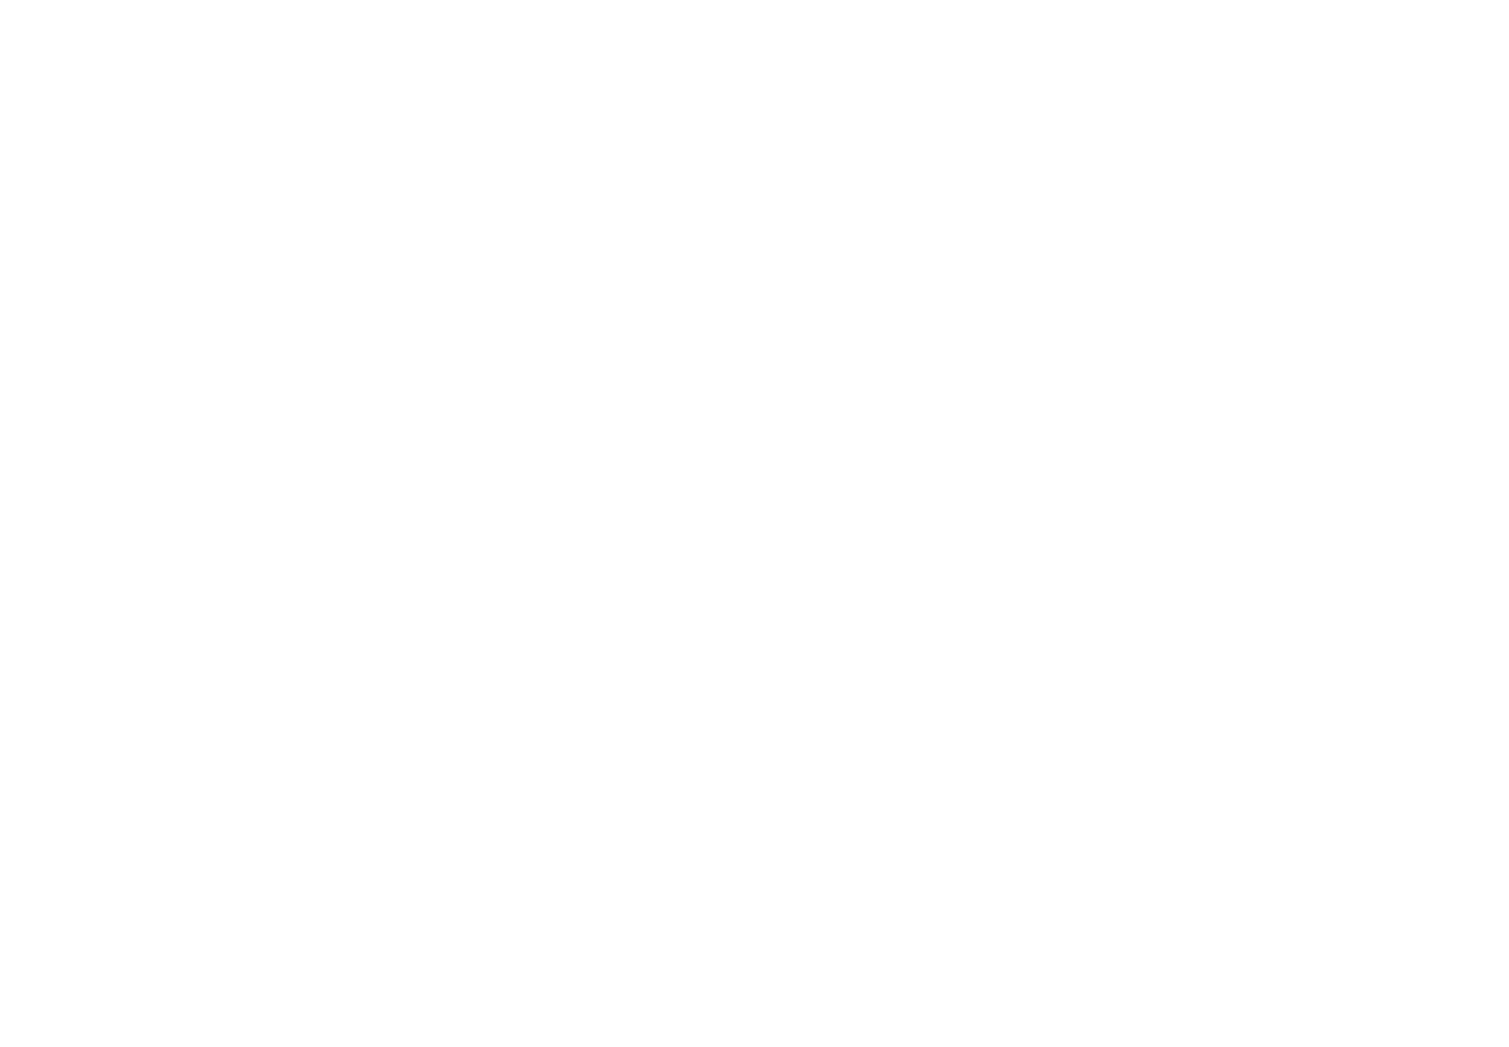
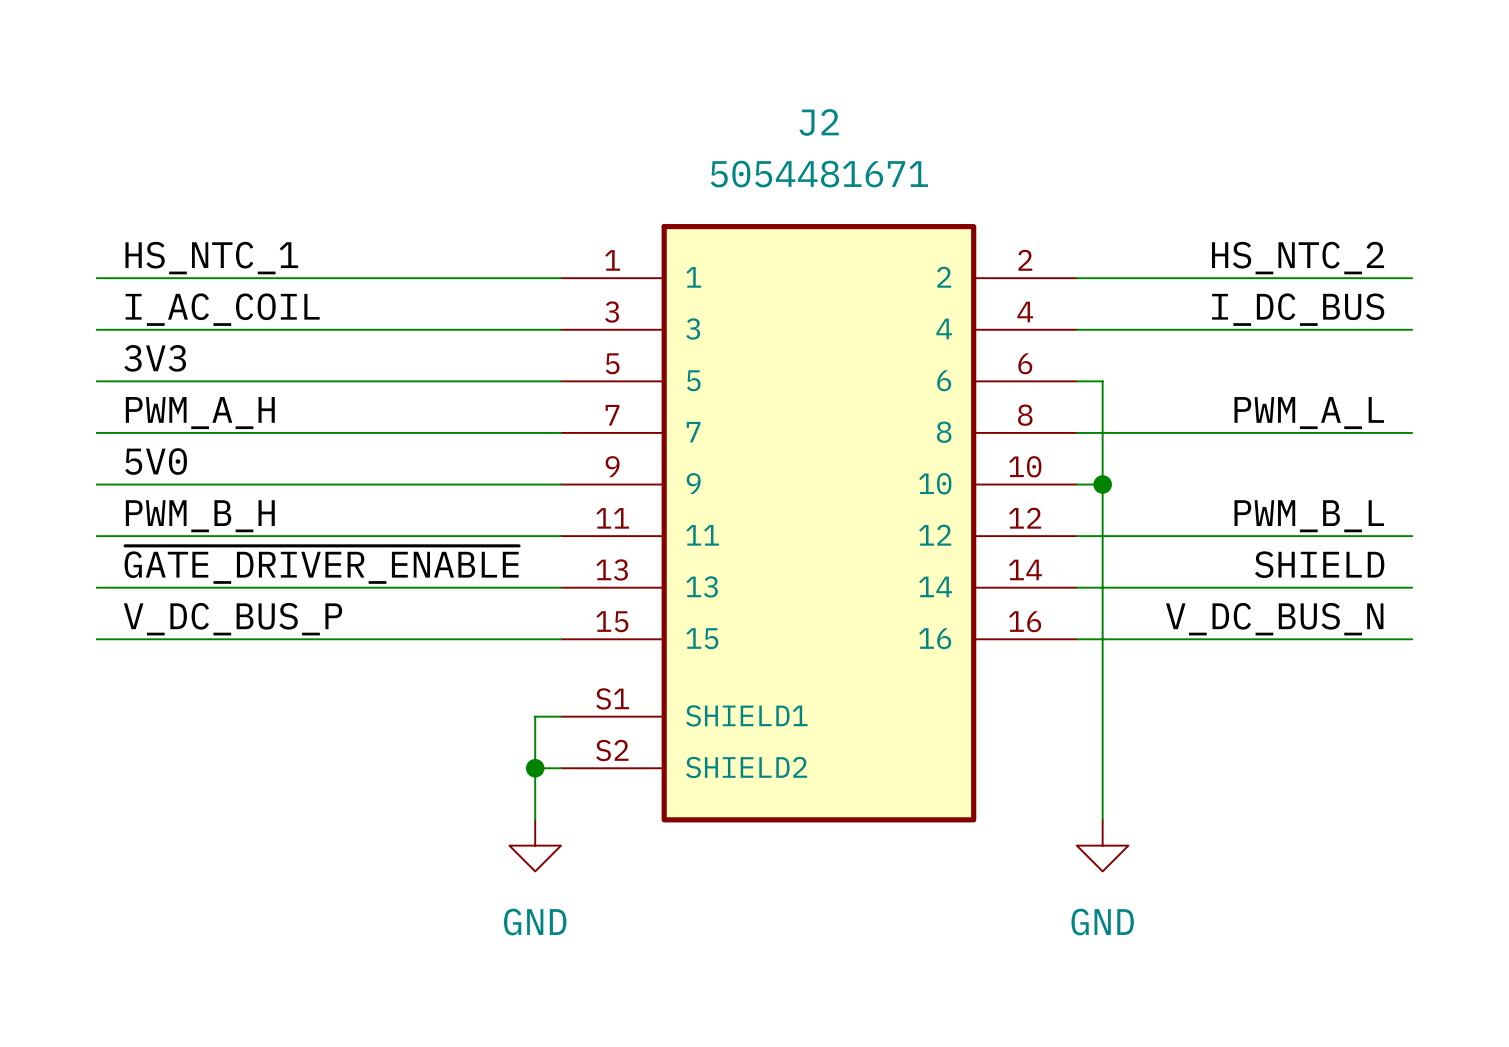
label: none -> HS_NTC_1 (211, 258)
label: none -> HS_NTC_2 (1298, 258)
wire: none -> (96, 278) (561, 278)
wire: none -> (1076, 278) (1412, 278)
label: none -> I_AC_COIL (222, 309)
label: none -> I_DC_BUS (1298, 309)
wire: none -> (96, 329) (561, 329)
wire: none -> (1076, 329) (1412, 329)
label: none -> 3V3 (155, 358)
wire: none -> (96, 381) (561, 381)
wire: none -> (1076, 381) (1102, 381) (1102, 819)
label: none -> PWM_A_H (200, 413)
label: none -> PWM_A_L (1309, 413)
wire: none -> (96, 432) (561, 432)
wire: none -> (1076, 432) (1412, 432)
label: none -> 5V0 (156, 461)
wire: none -> (96, 484) (561, 484)
wire: none -> (1076, 484) (1102, 484)
junction: none -> (1102, 484)
label: none -> PWM_B_H (200, 516)
label: none -> PWM_B_L (1309, 516)
J2: none -> 5054481671 (818, 523)
wire: none -> (96, 536) (561, 536)
wire: none -> (1076, 536) (1412, 536)
label: none -> ~{GATE_DRIVER_ENABLE} (321, 564)
label: none -> SHIELD (1319, 564)
wire: none -> (96, 587) (561, 587)
wire: none -> (1076, 587) (1412, 587)
label: none -> V_DC_BUS_P (233, 619)
label: none -> V_DC_BUS_N (1274, 619)
wire: none -> (96, 639) (561, 639)
wire: none -> (1076, 639) (1412, 639)
wire: none -> (561, 716) (535, 716) (535, 819)
wire: none -> (535, 768) (561, 768)
junction: none -> (535, 768)
power symbol: none -> GND (535, 845)
power symbol: none -> GND (1102, 845)

